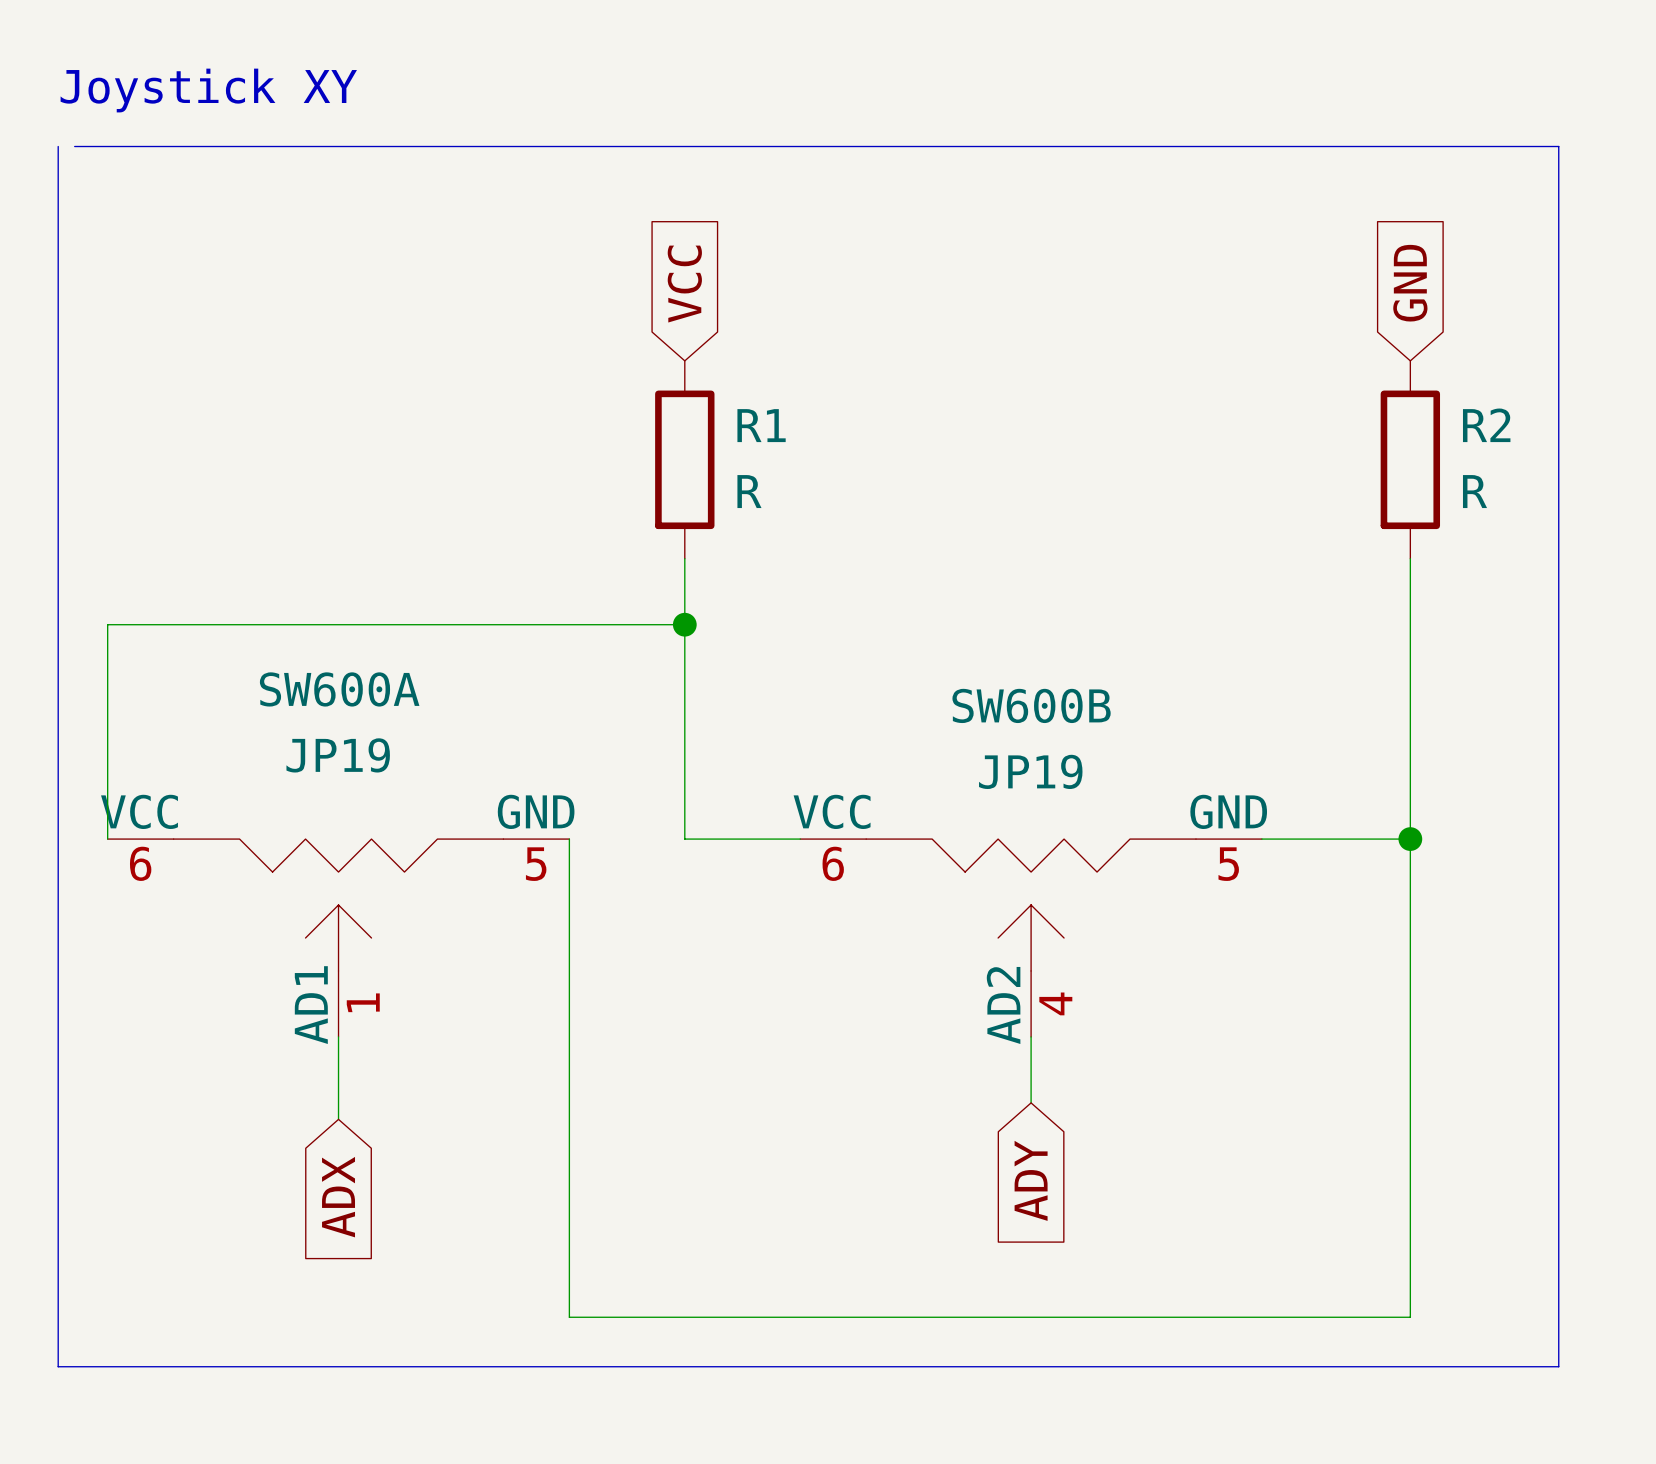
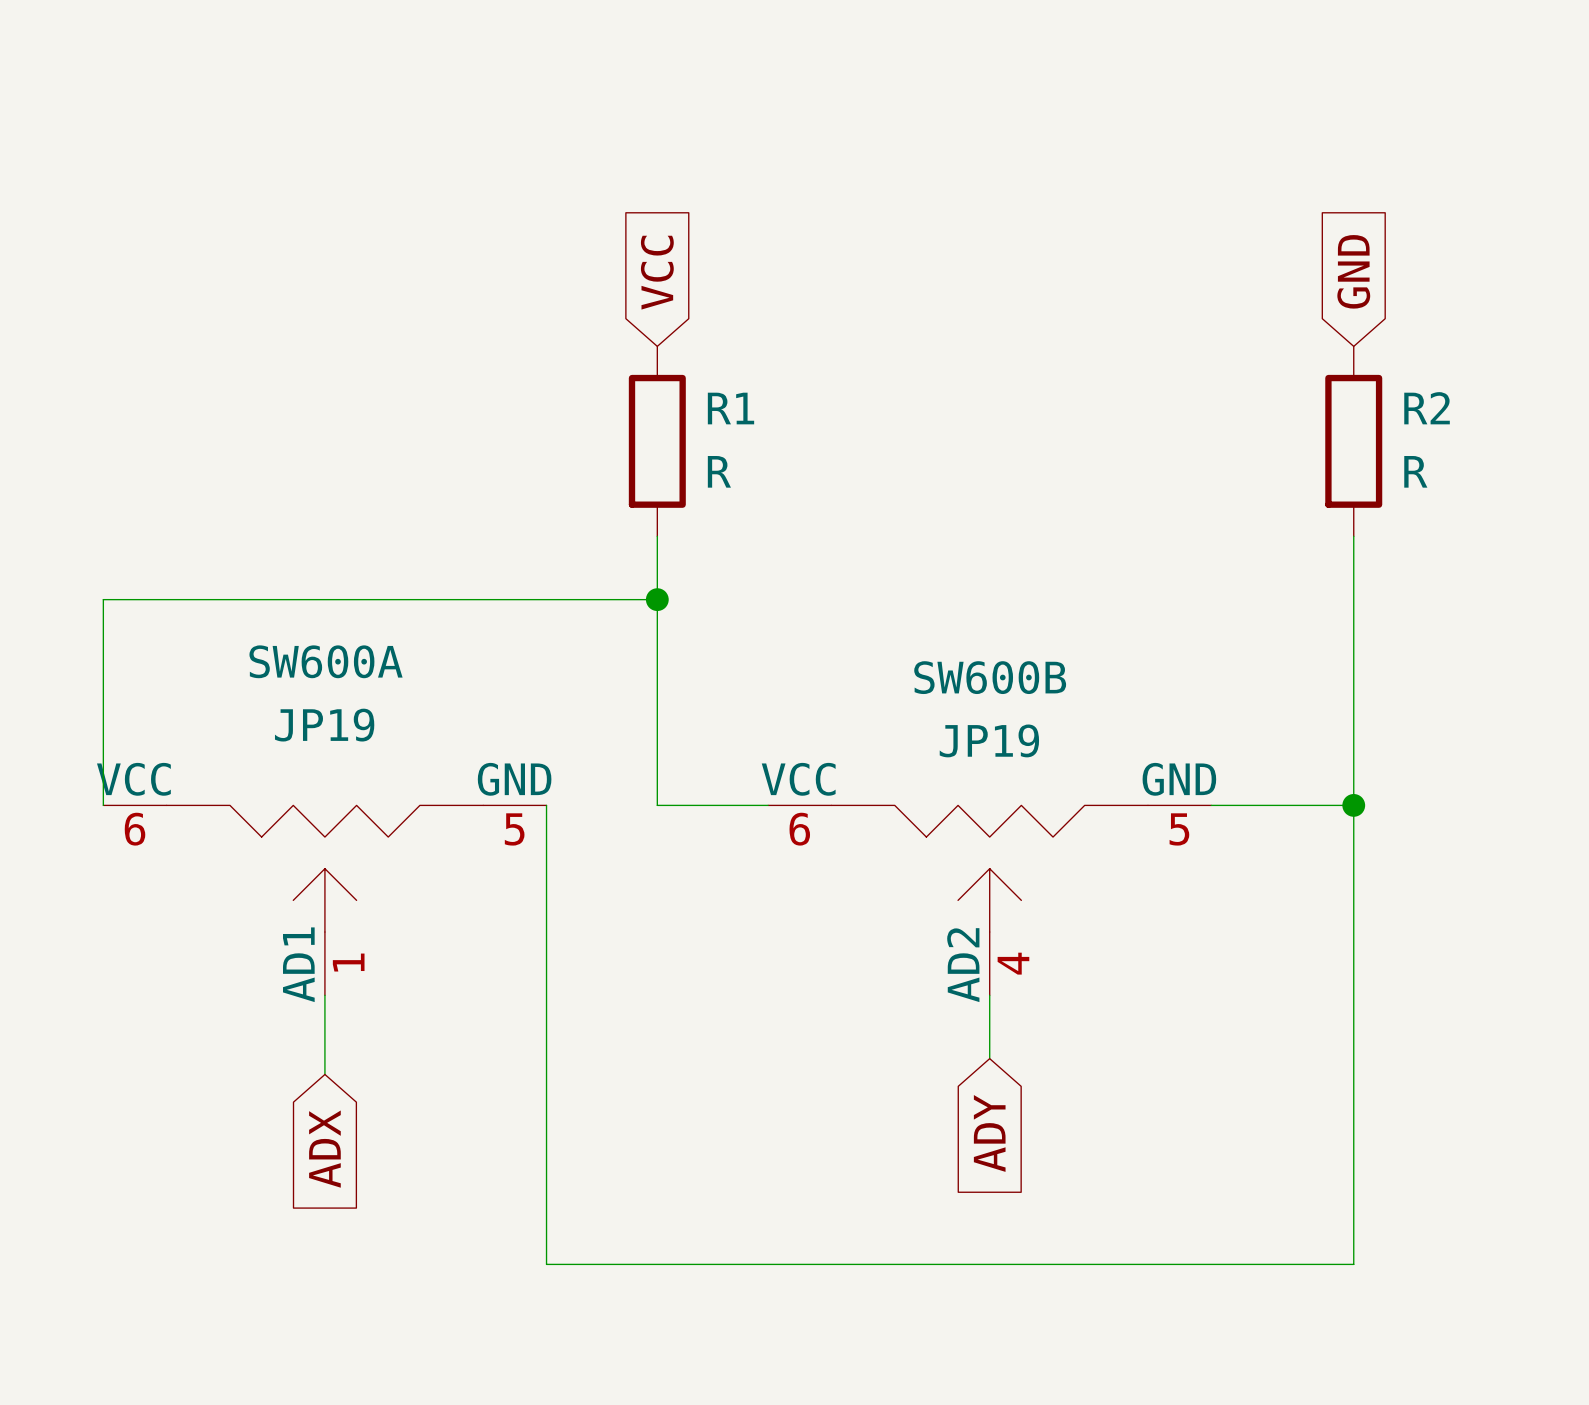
text: Joystick XY (208, 90) -> none
line: (58, 146) (58, 1366) (1558, 1366) (1558, 146) (74, 146) -> none

